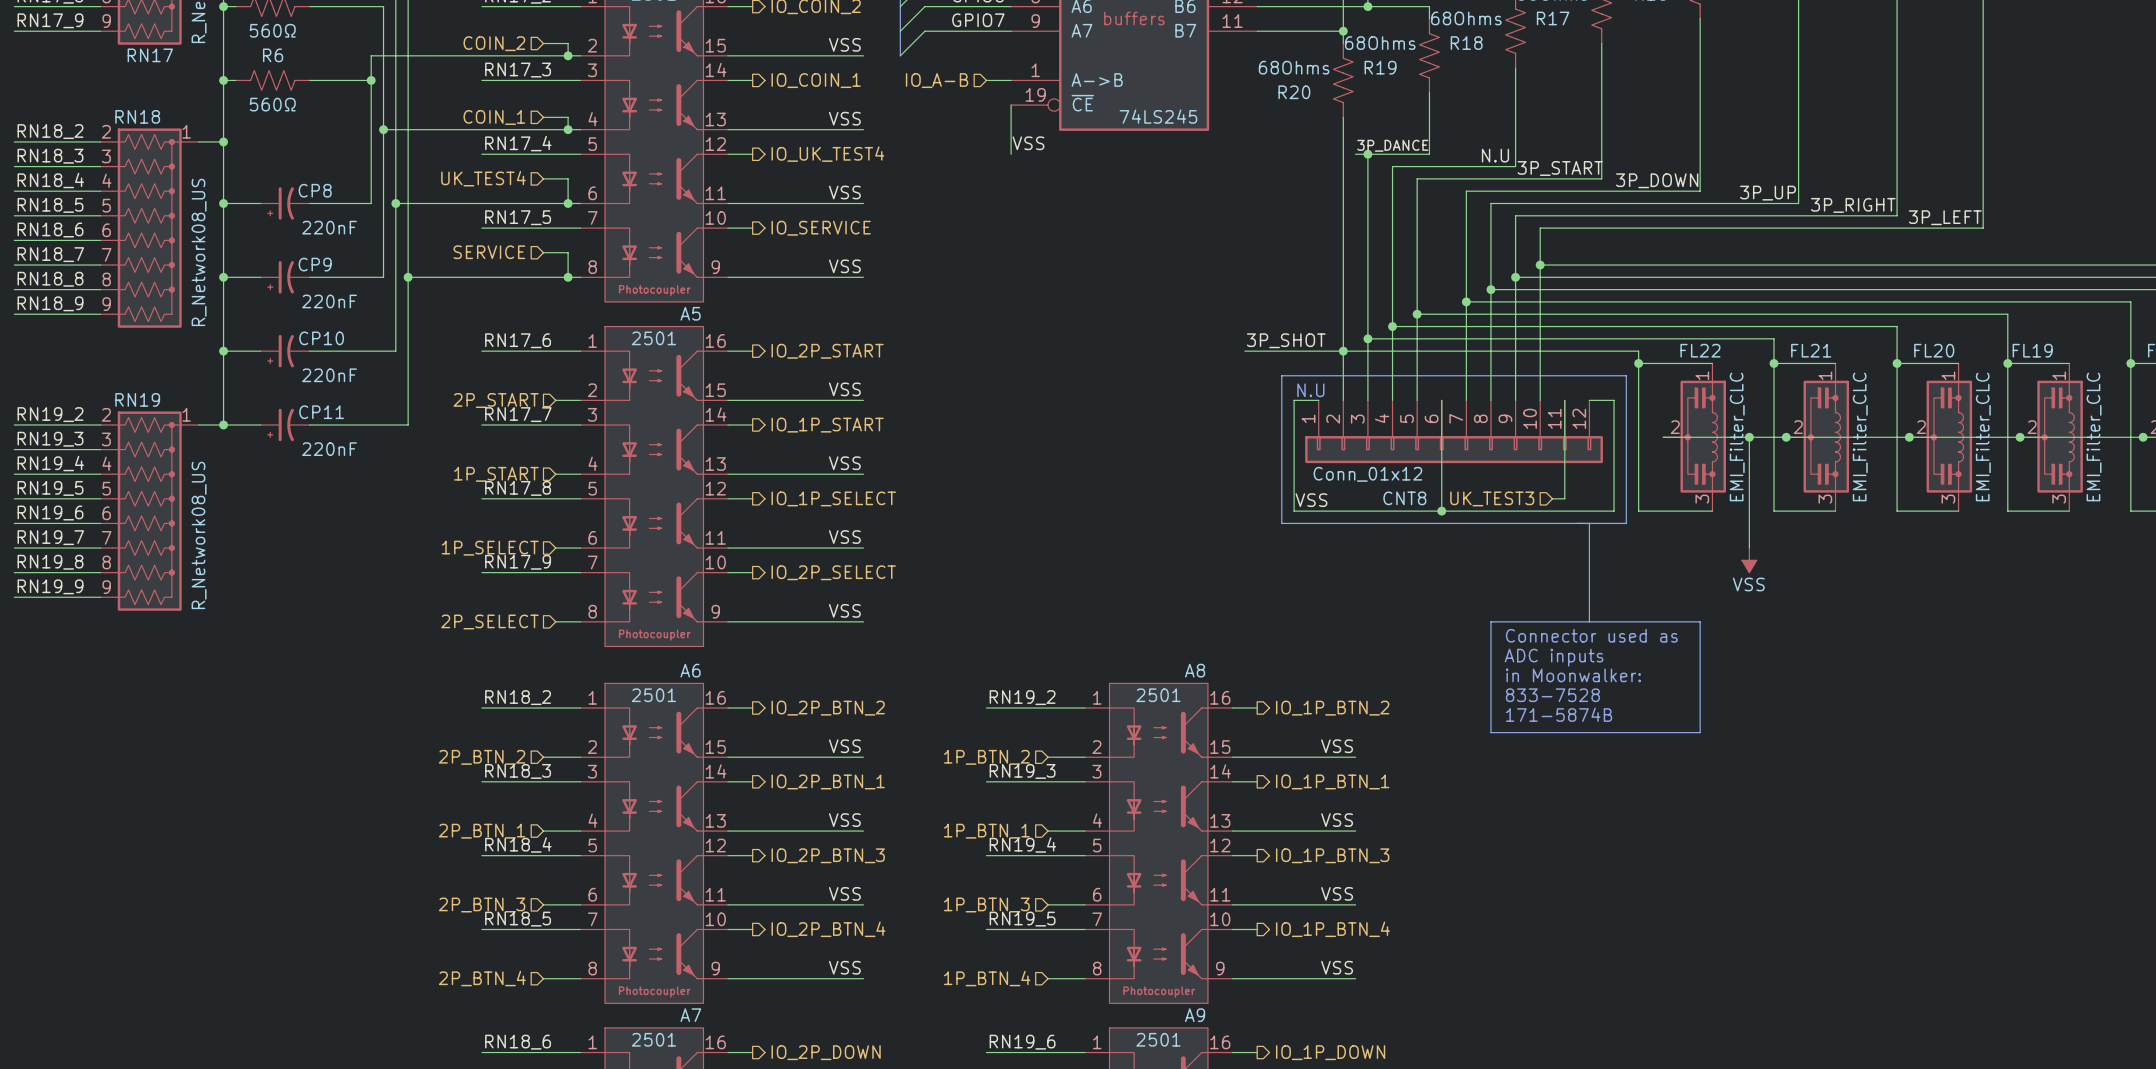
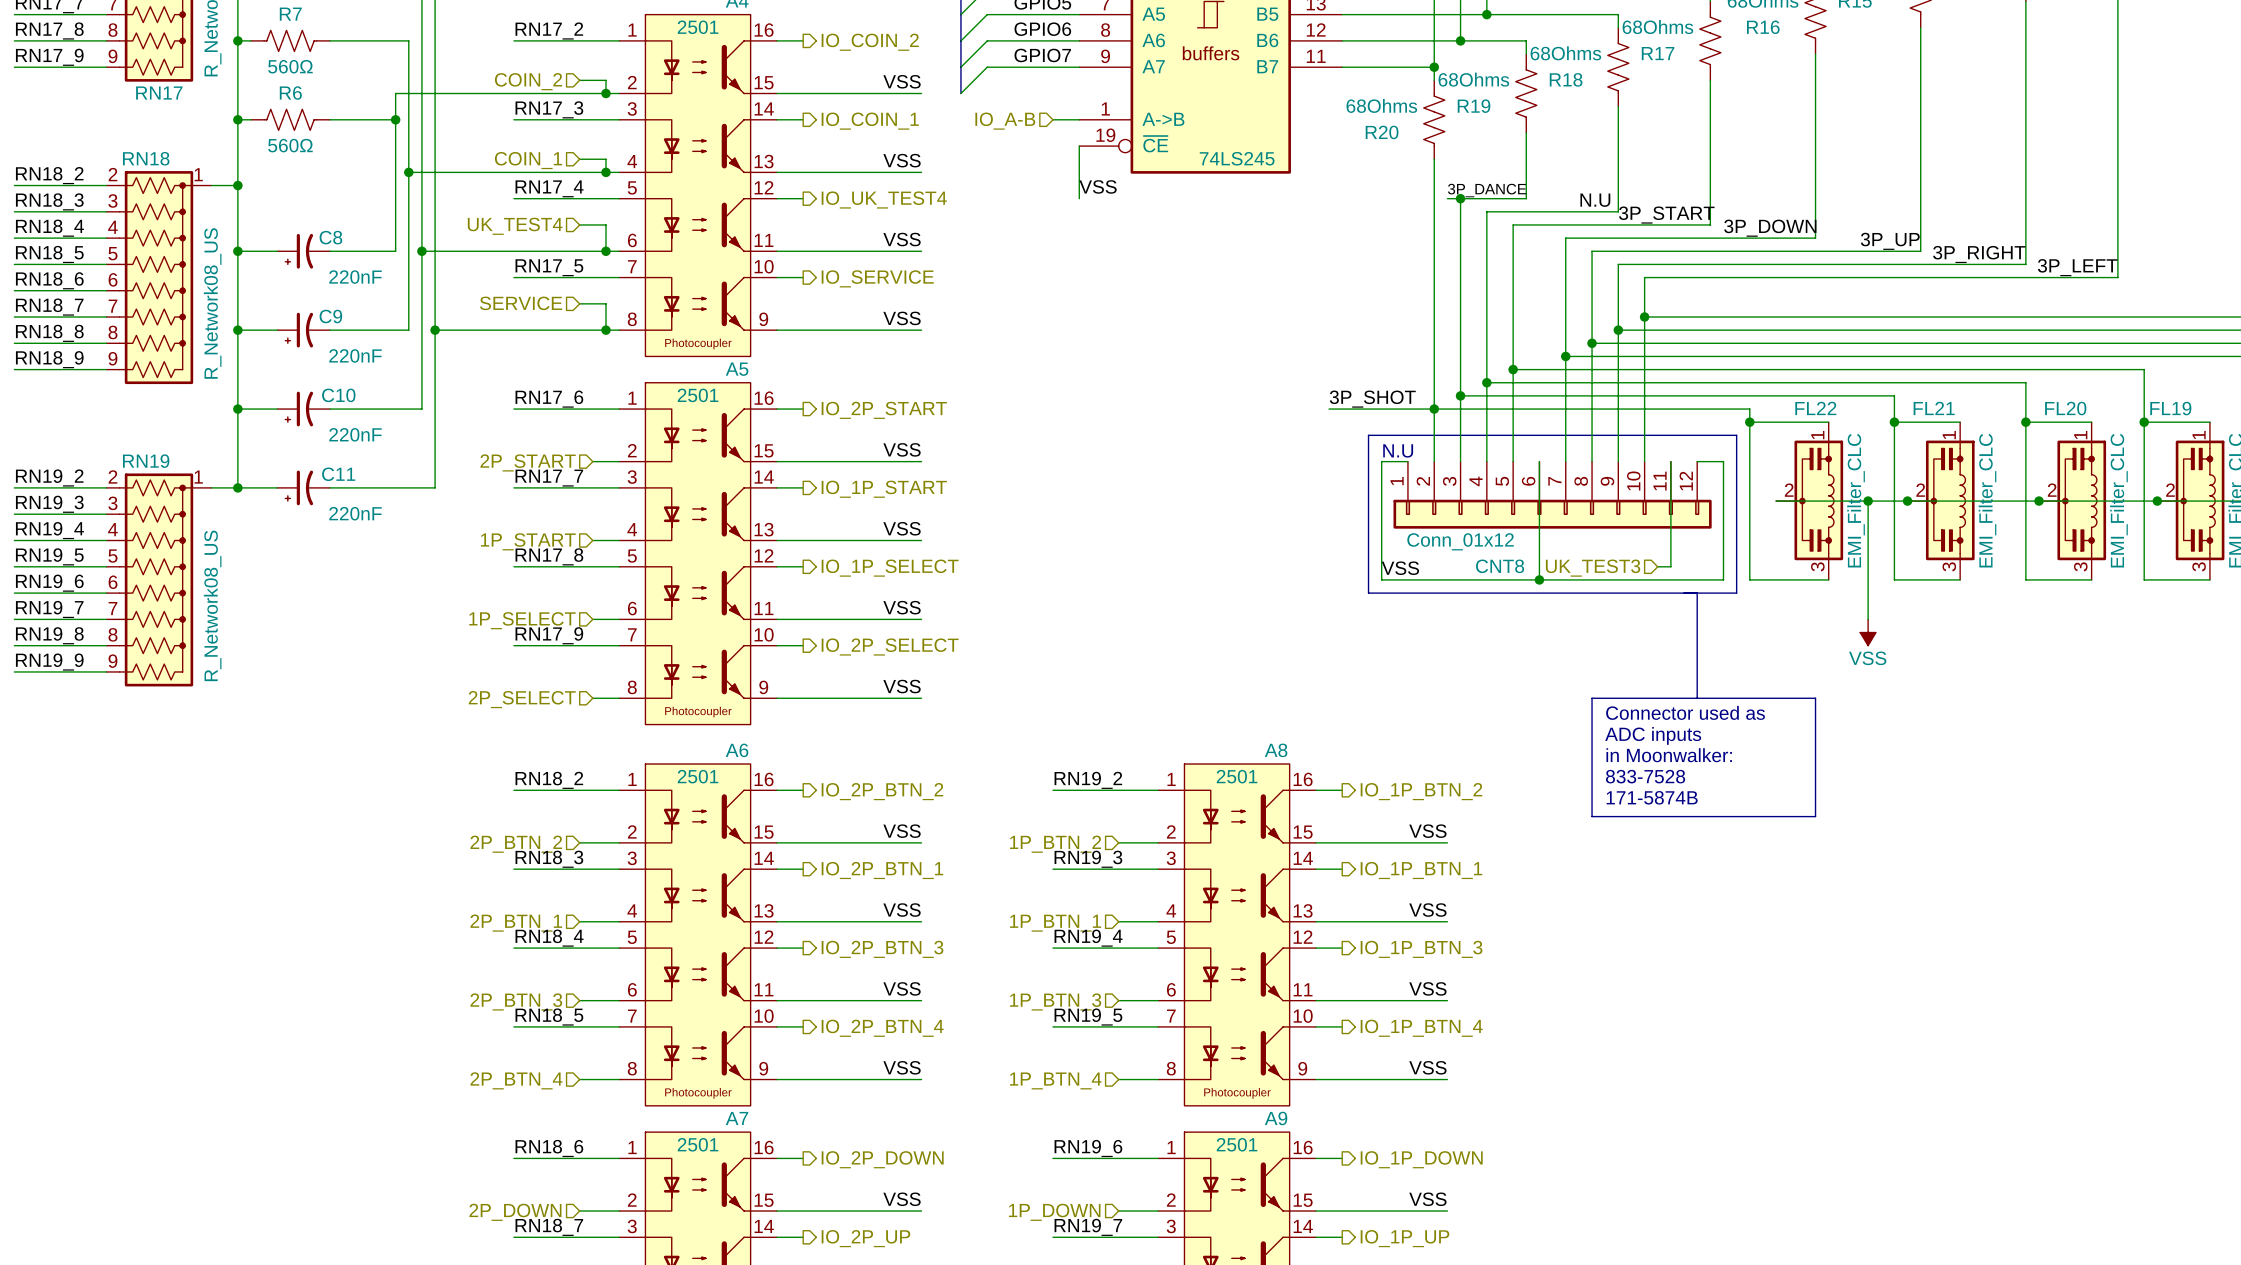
CP8 name: CP8 (315, 190) -> C8 (330, 237)
CP9 name: CP9 (315, 264) -> C9 (330, 316)
CP10 name: CP10 (321, 338) -> C10 (338, 395)
CP11 name: CP11 (321, 412) -> C11 (338, 474)

